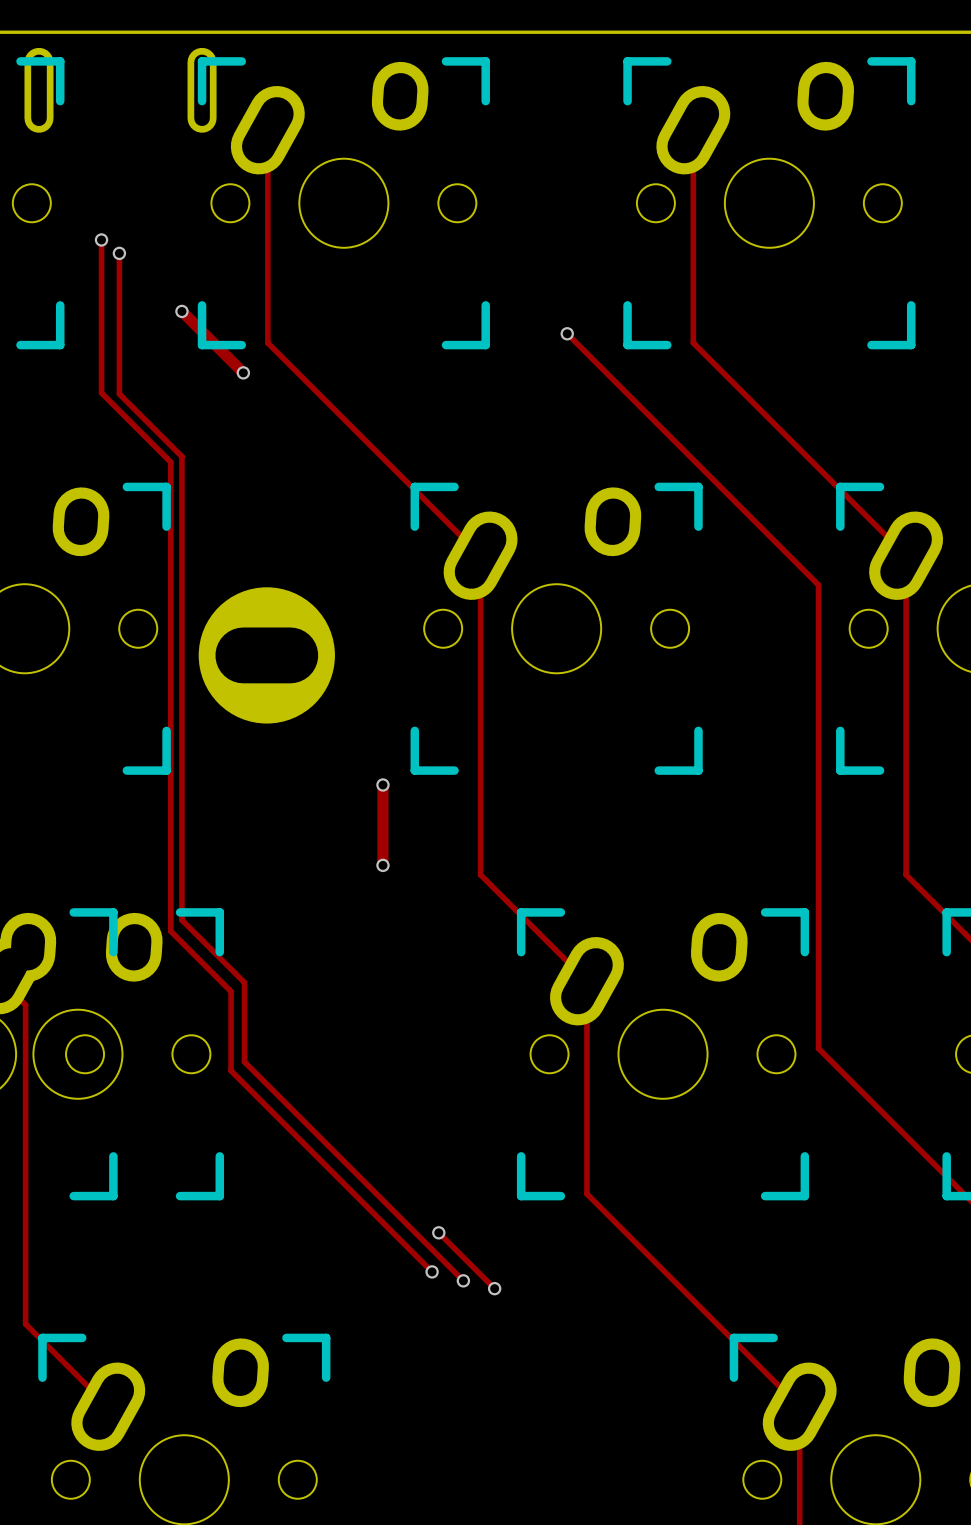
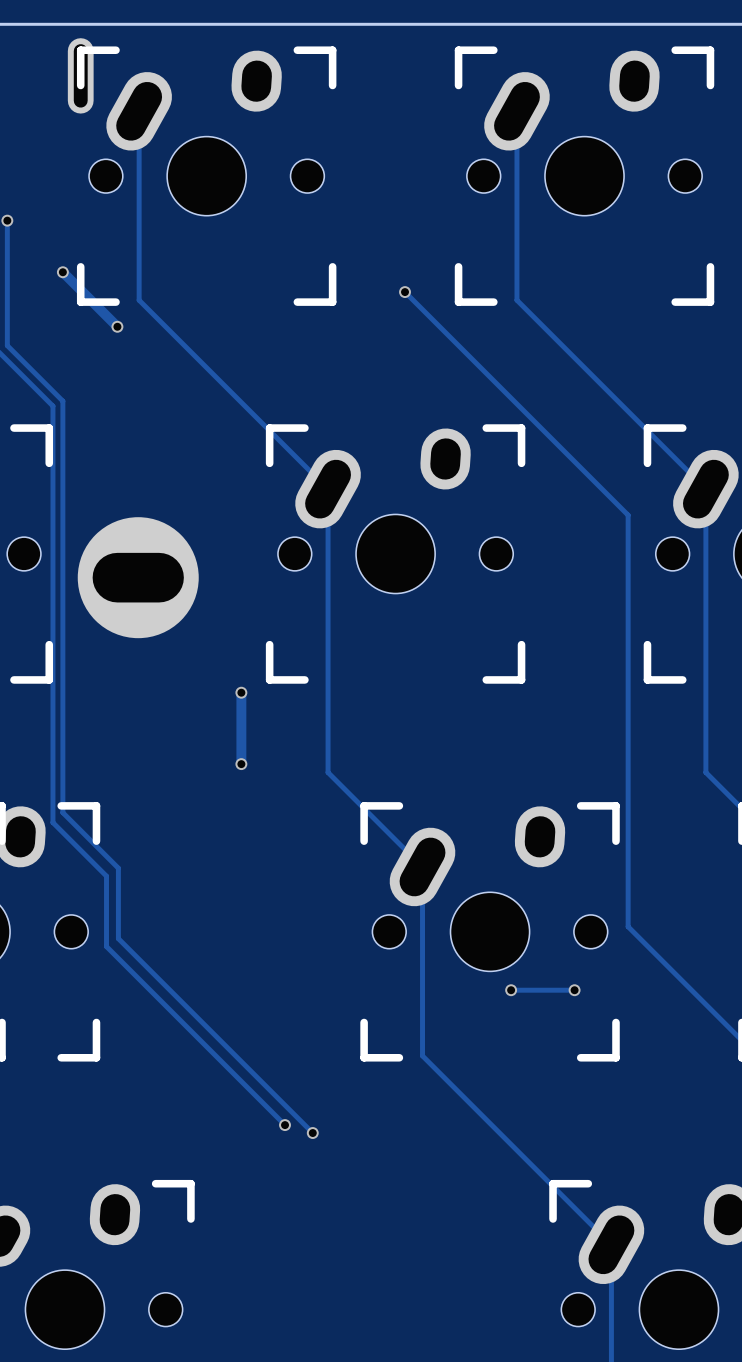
track: none -> (511, 990) (574, 990)
via: none -> (511, 990)
via: none -> (574, 990)
track: (438, 1232) (494, 1288) -> none
via: (438, 1232) -> none
via: (494, 1288) -> none

